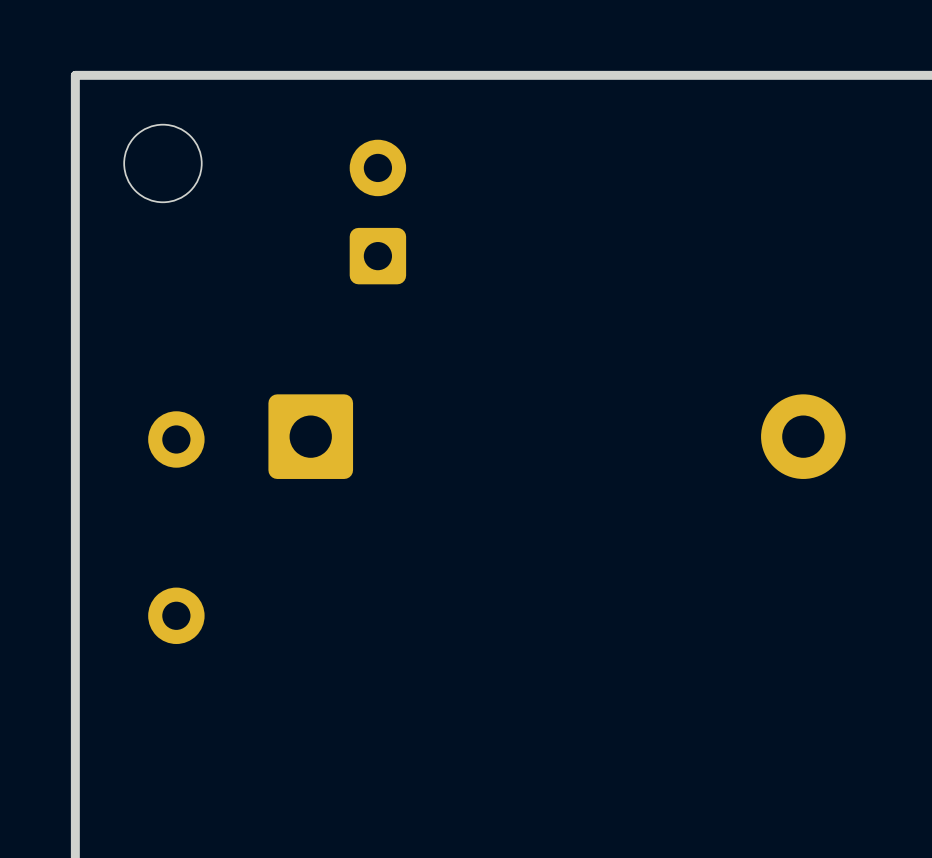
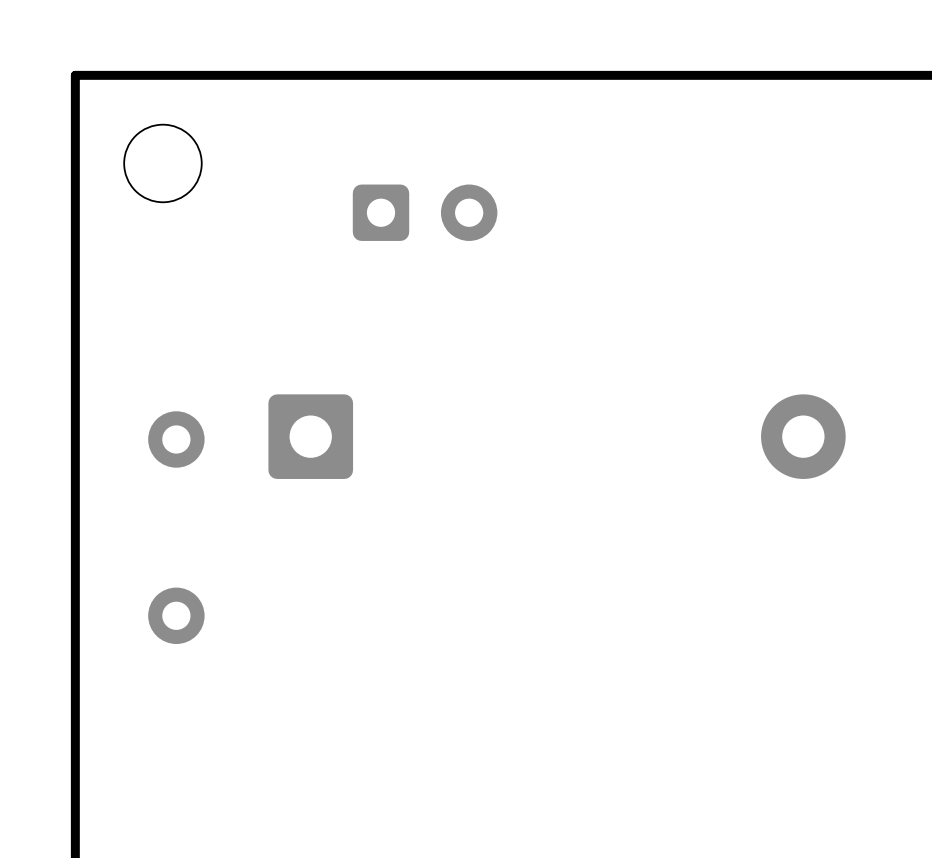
part rotation: 0° (377, 212) -> 90° clockwise (425, 212)

